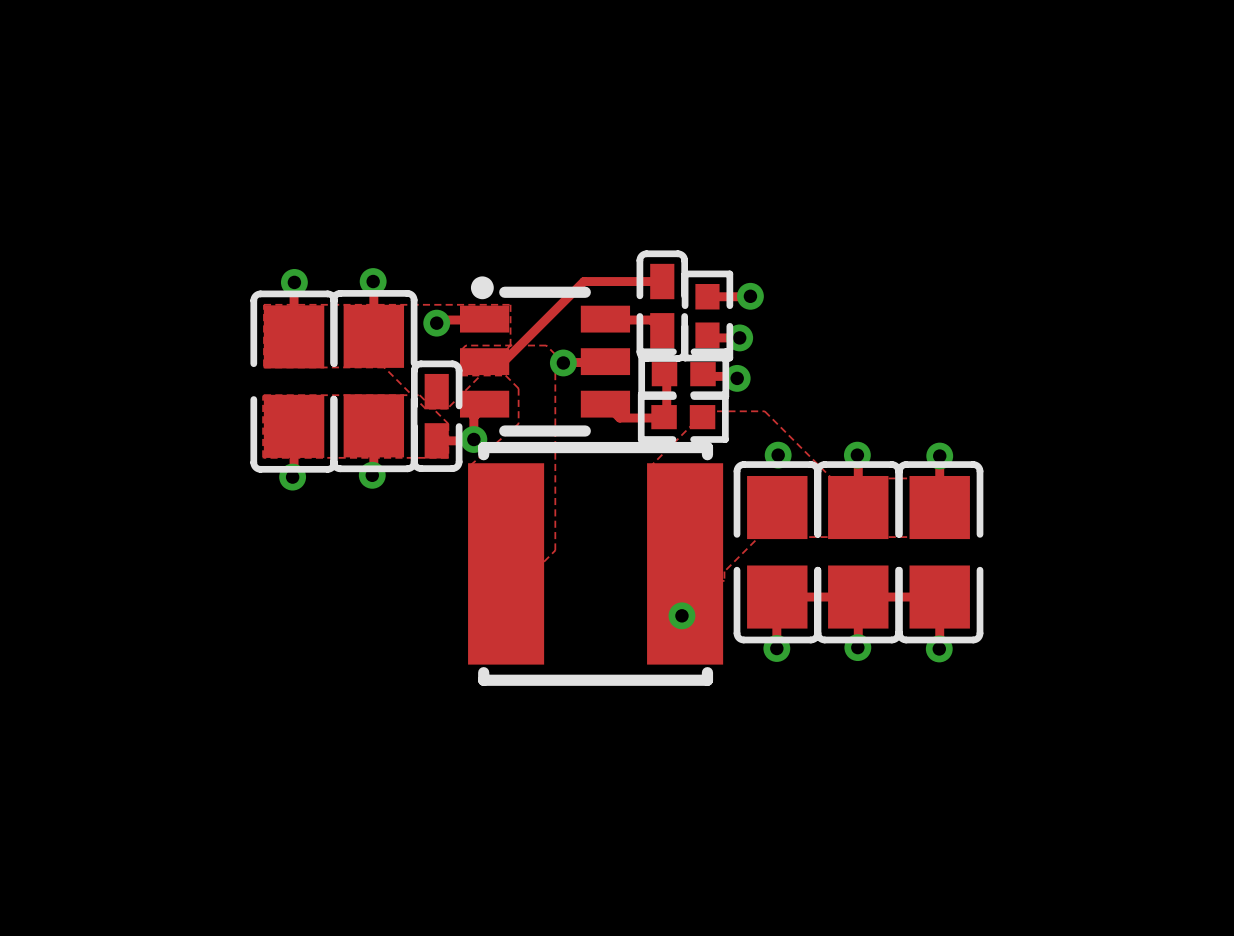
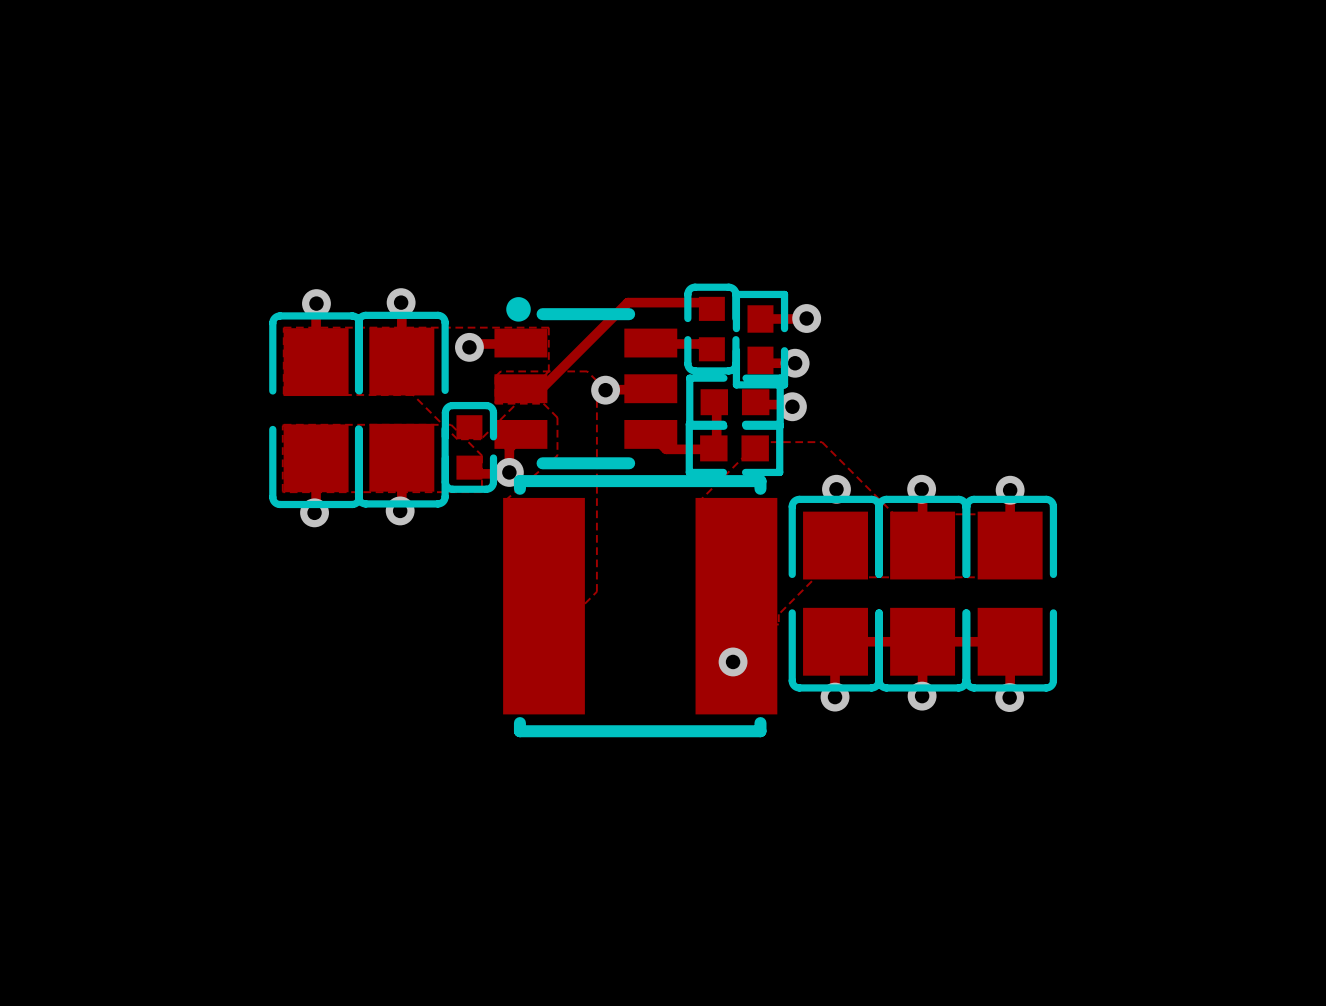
part footprint: [636, 250, 689, 362] -> [684, 283, 740, 375]
part footprint: [410, 360, 463, 472] -> [441, 401, 498, 493]

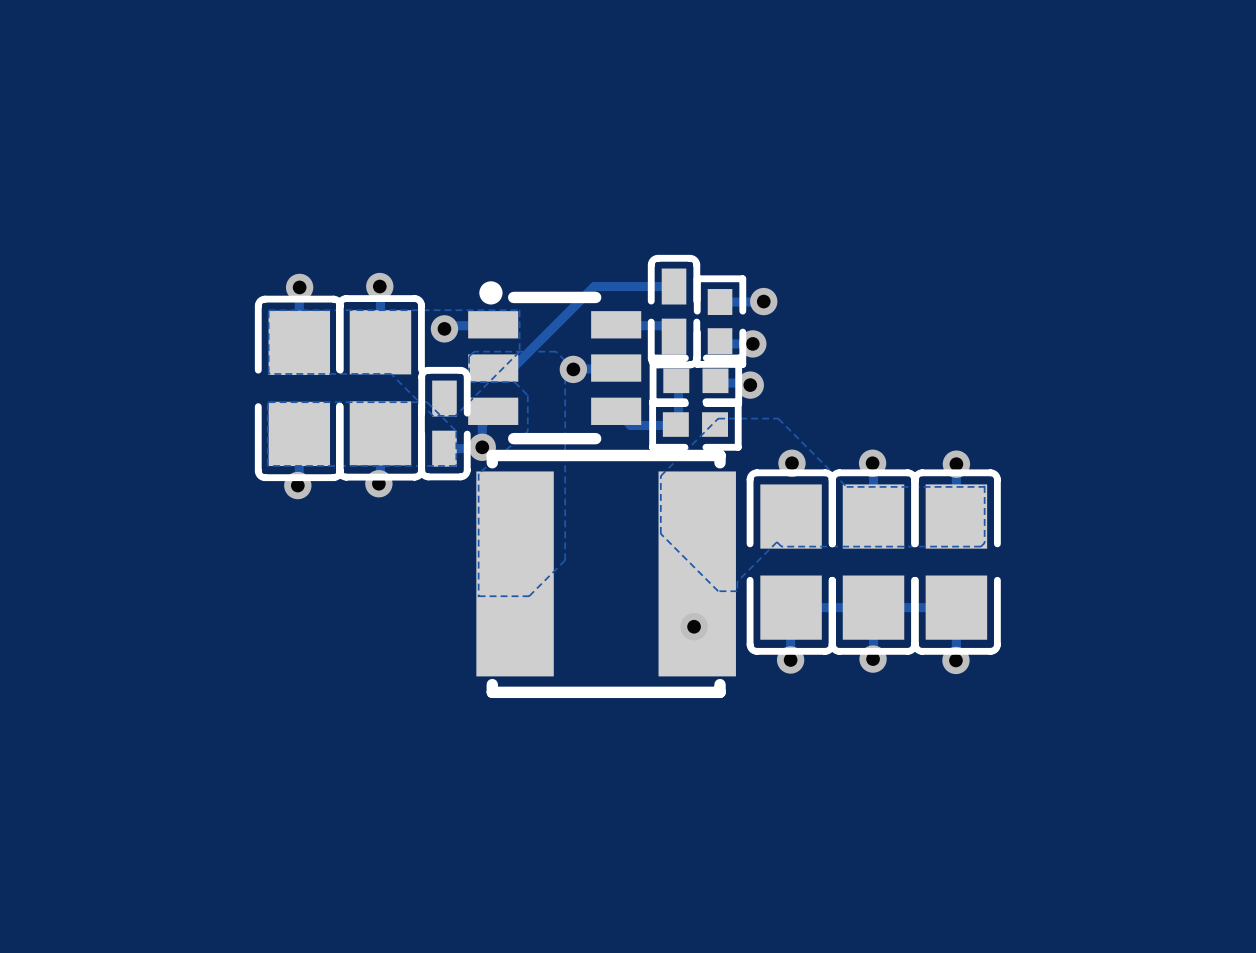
part footprint: [684, 283, 740, 375] -> [647, 254, 701, 369]
part footprint: [441, 401, 498, 493] -> [418, 366, 471, 481]

